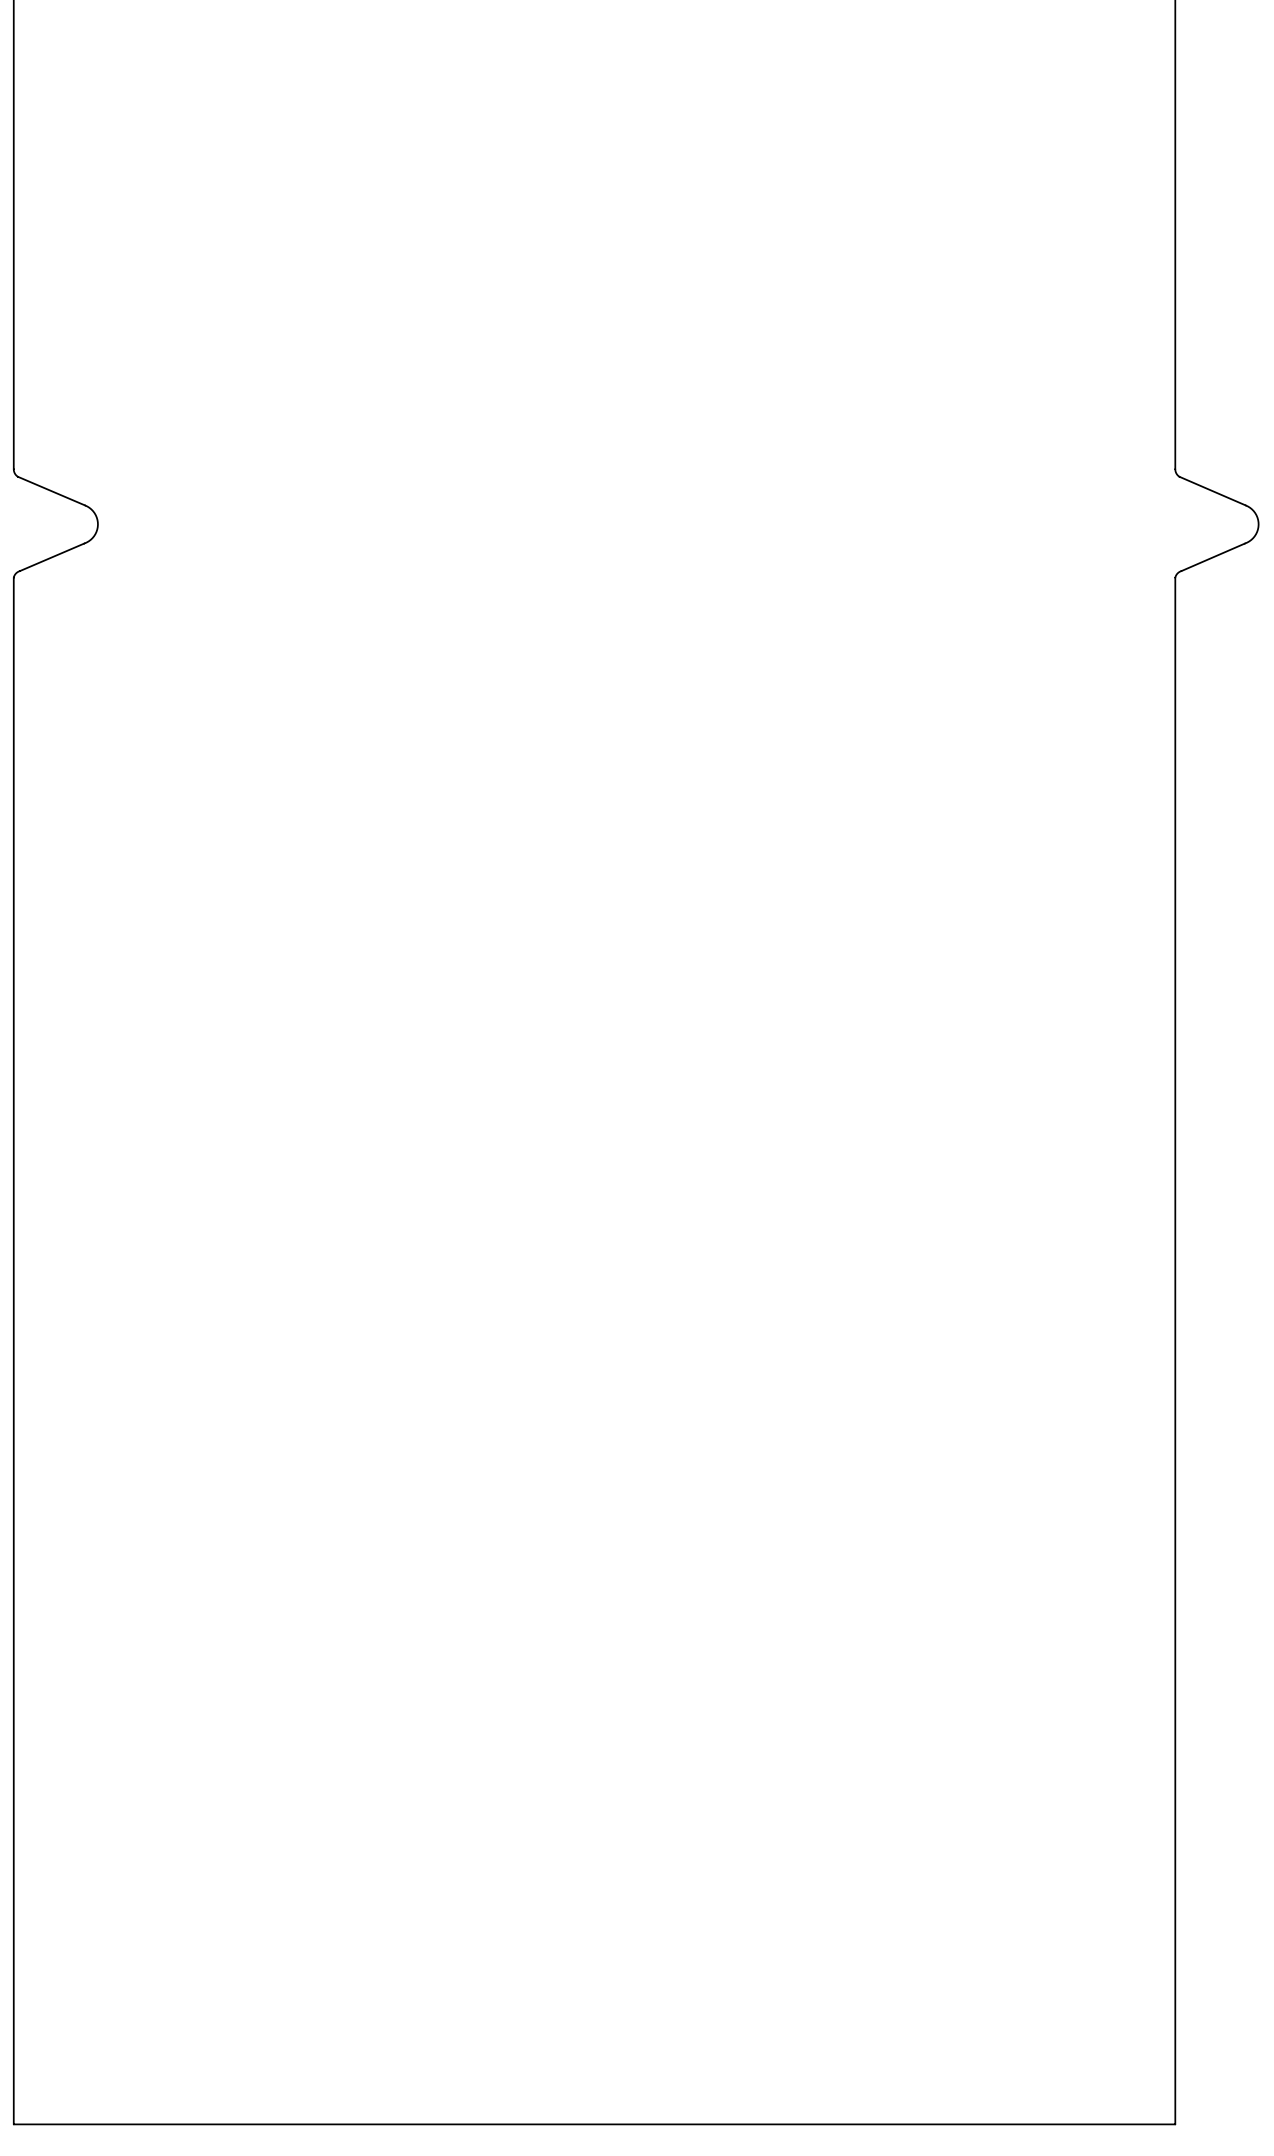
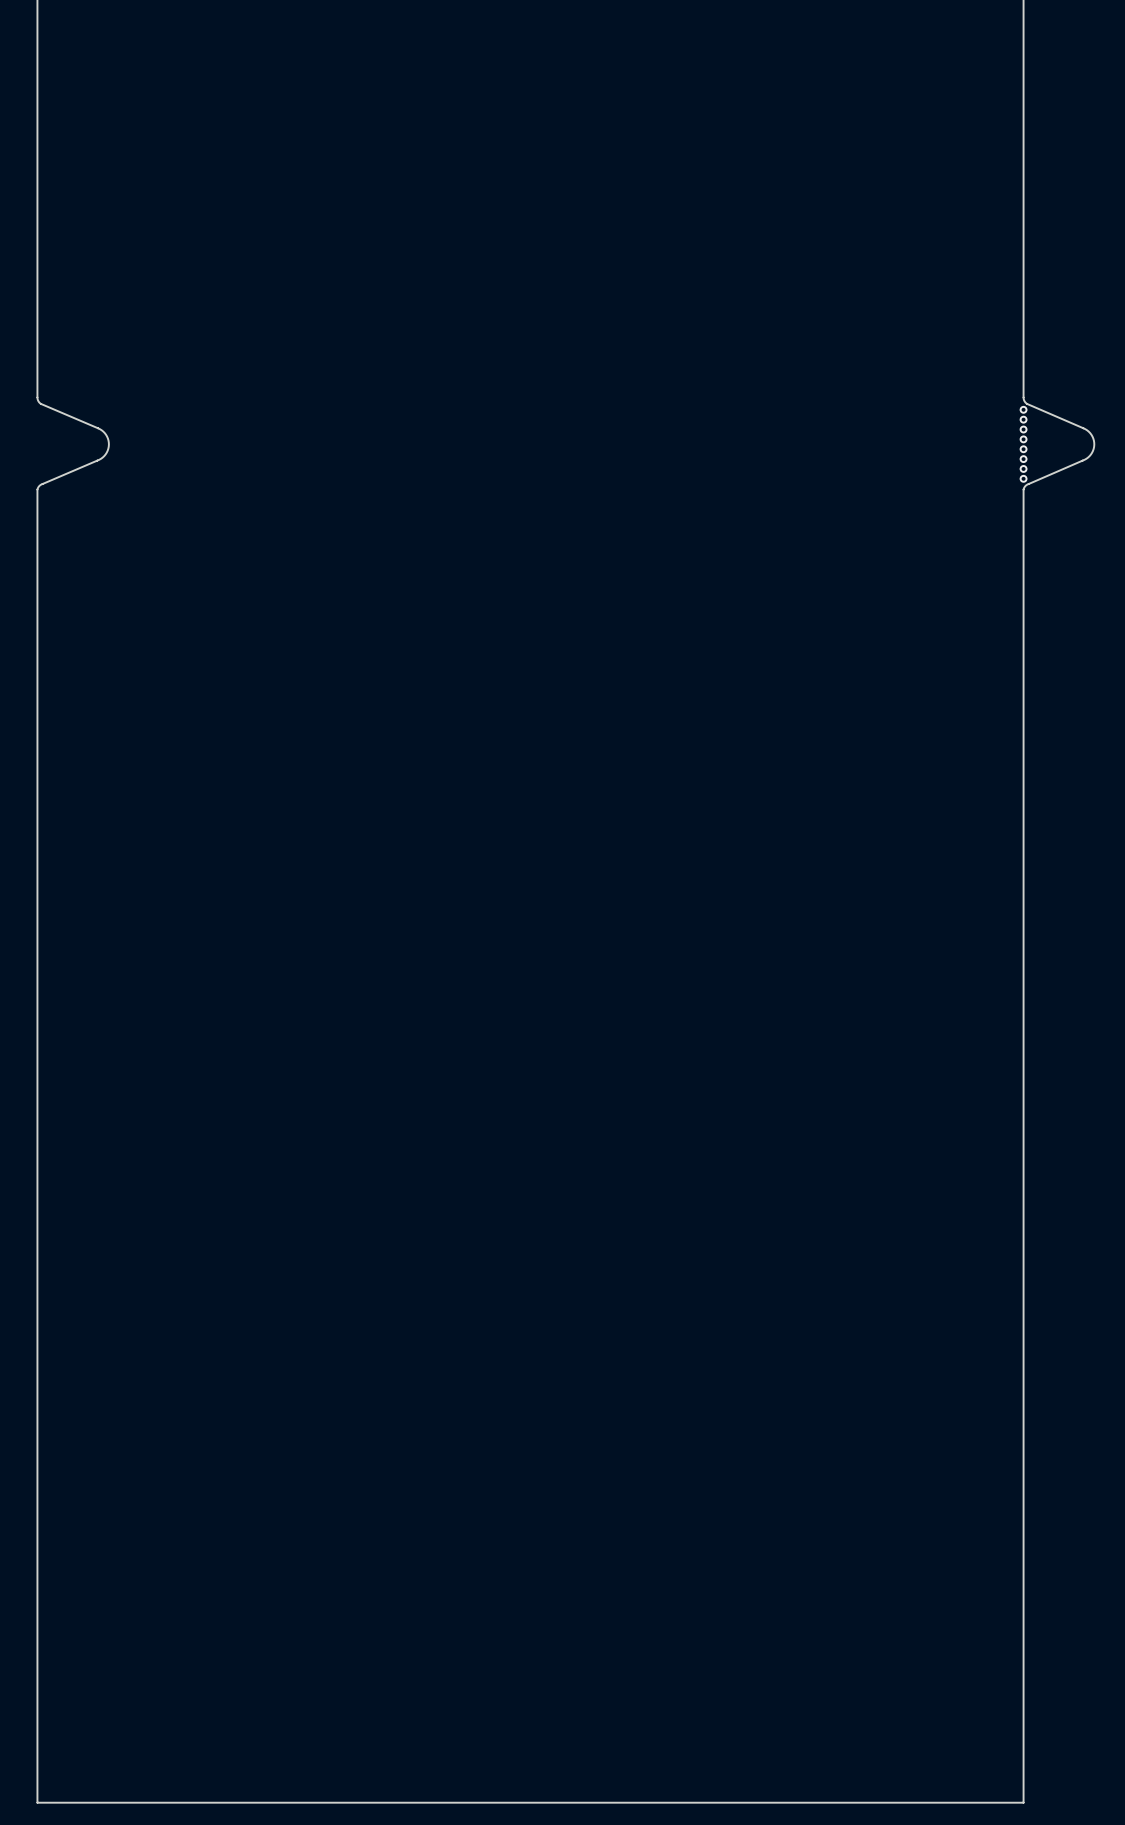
via: none -> (1023, 409)
via: none -> (1023, 419)
via: none -> (1023, 429)
via: none -> (1023, 439)
via: none -> (1023, 449)
via: none -> (1023, 459)
via: none -> (1023, 468)
via: none -> (1023, 478)

